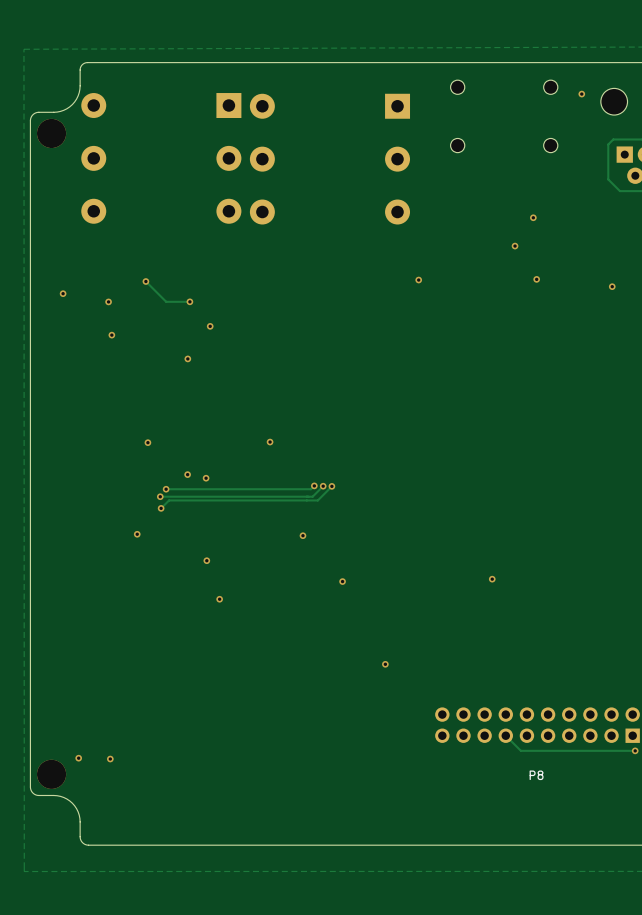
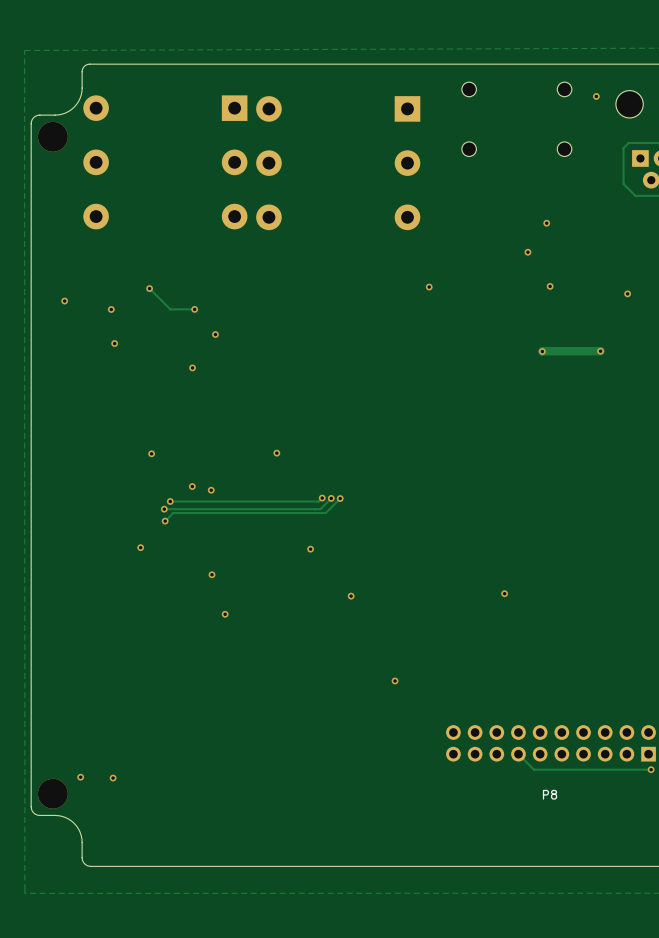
via: none -> (542, 351)
track: none -> (600, 351) (542, 351)
via: none -> (600, 351)

